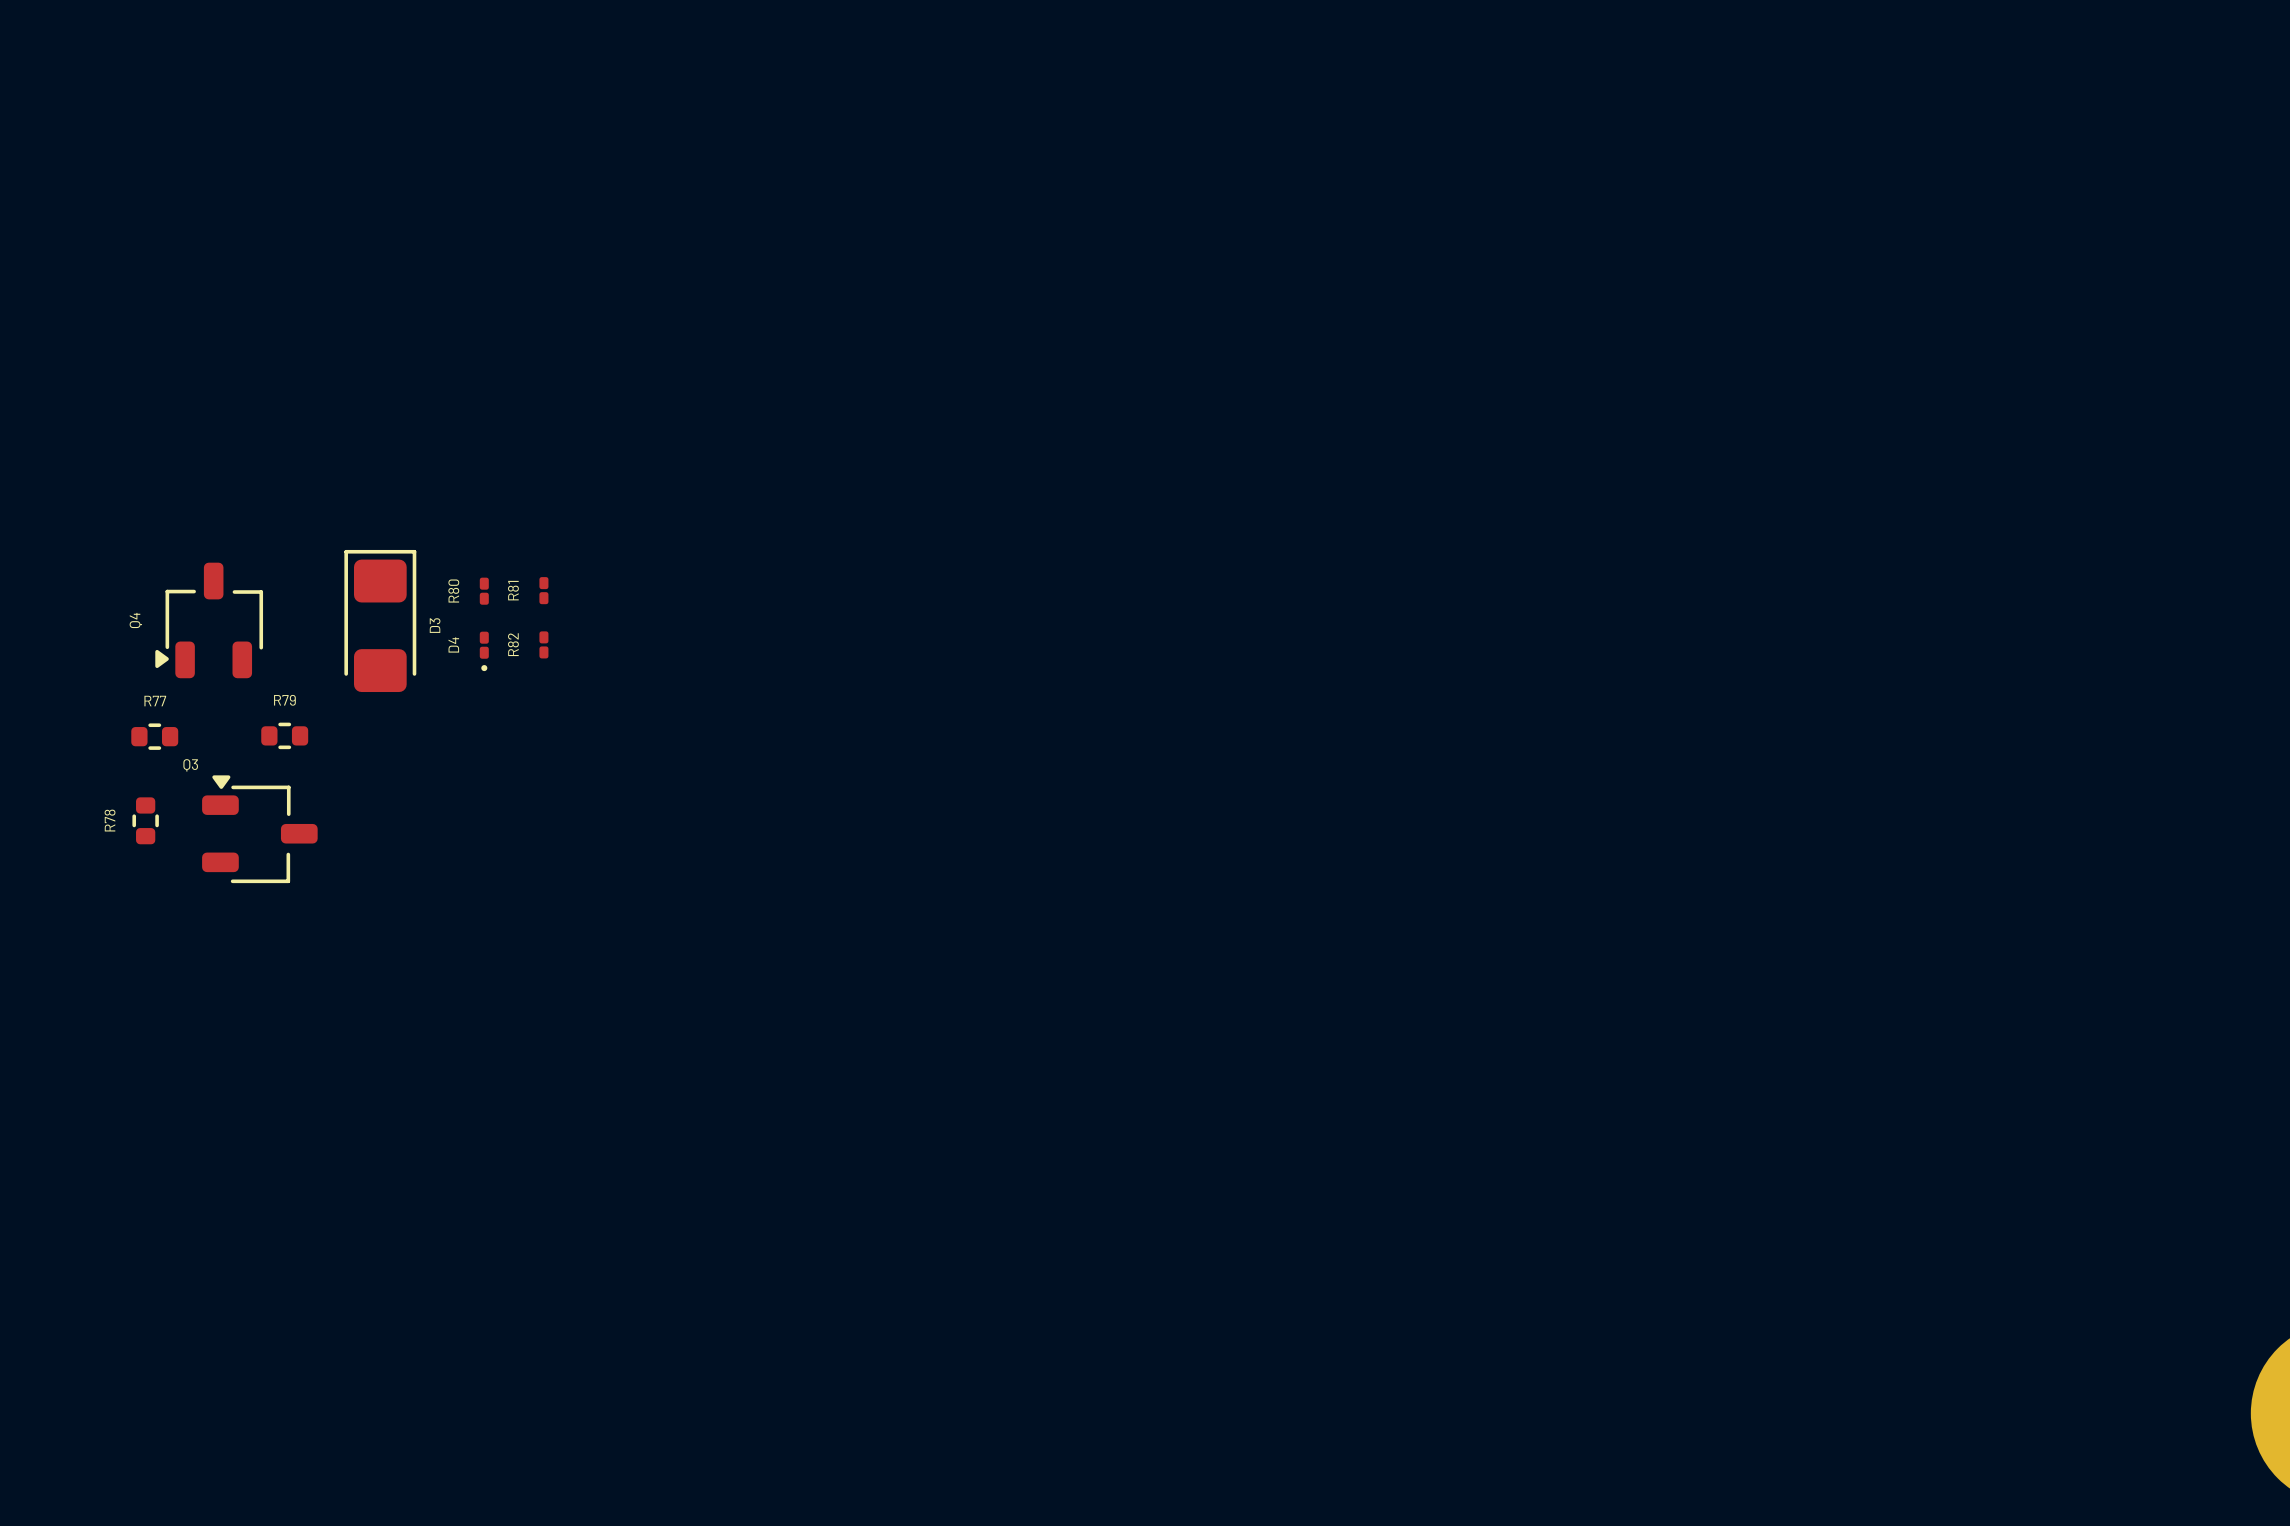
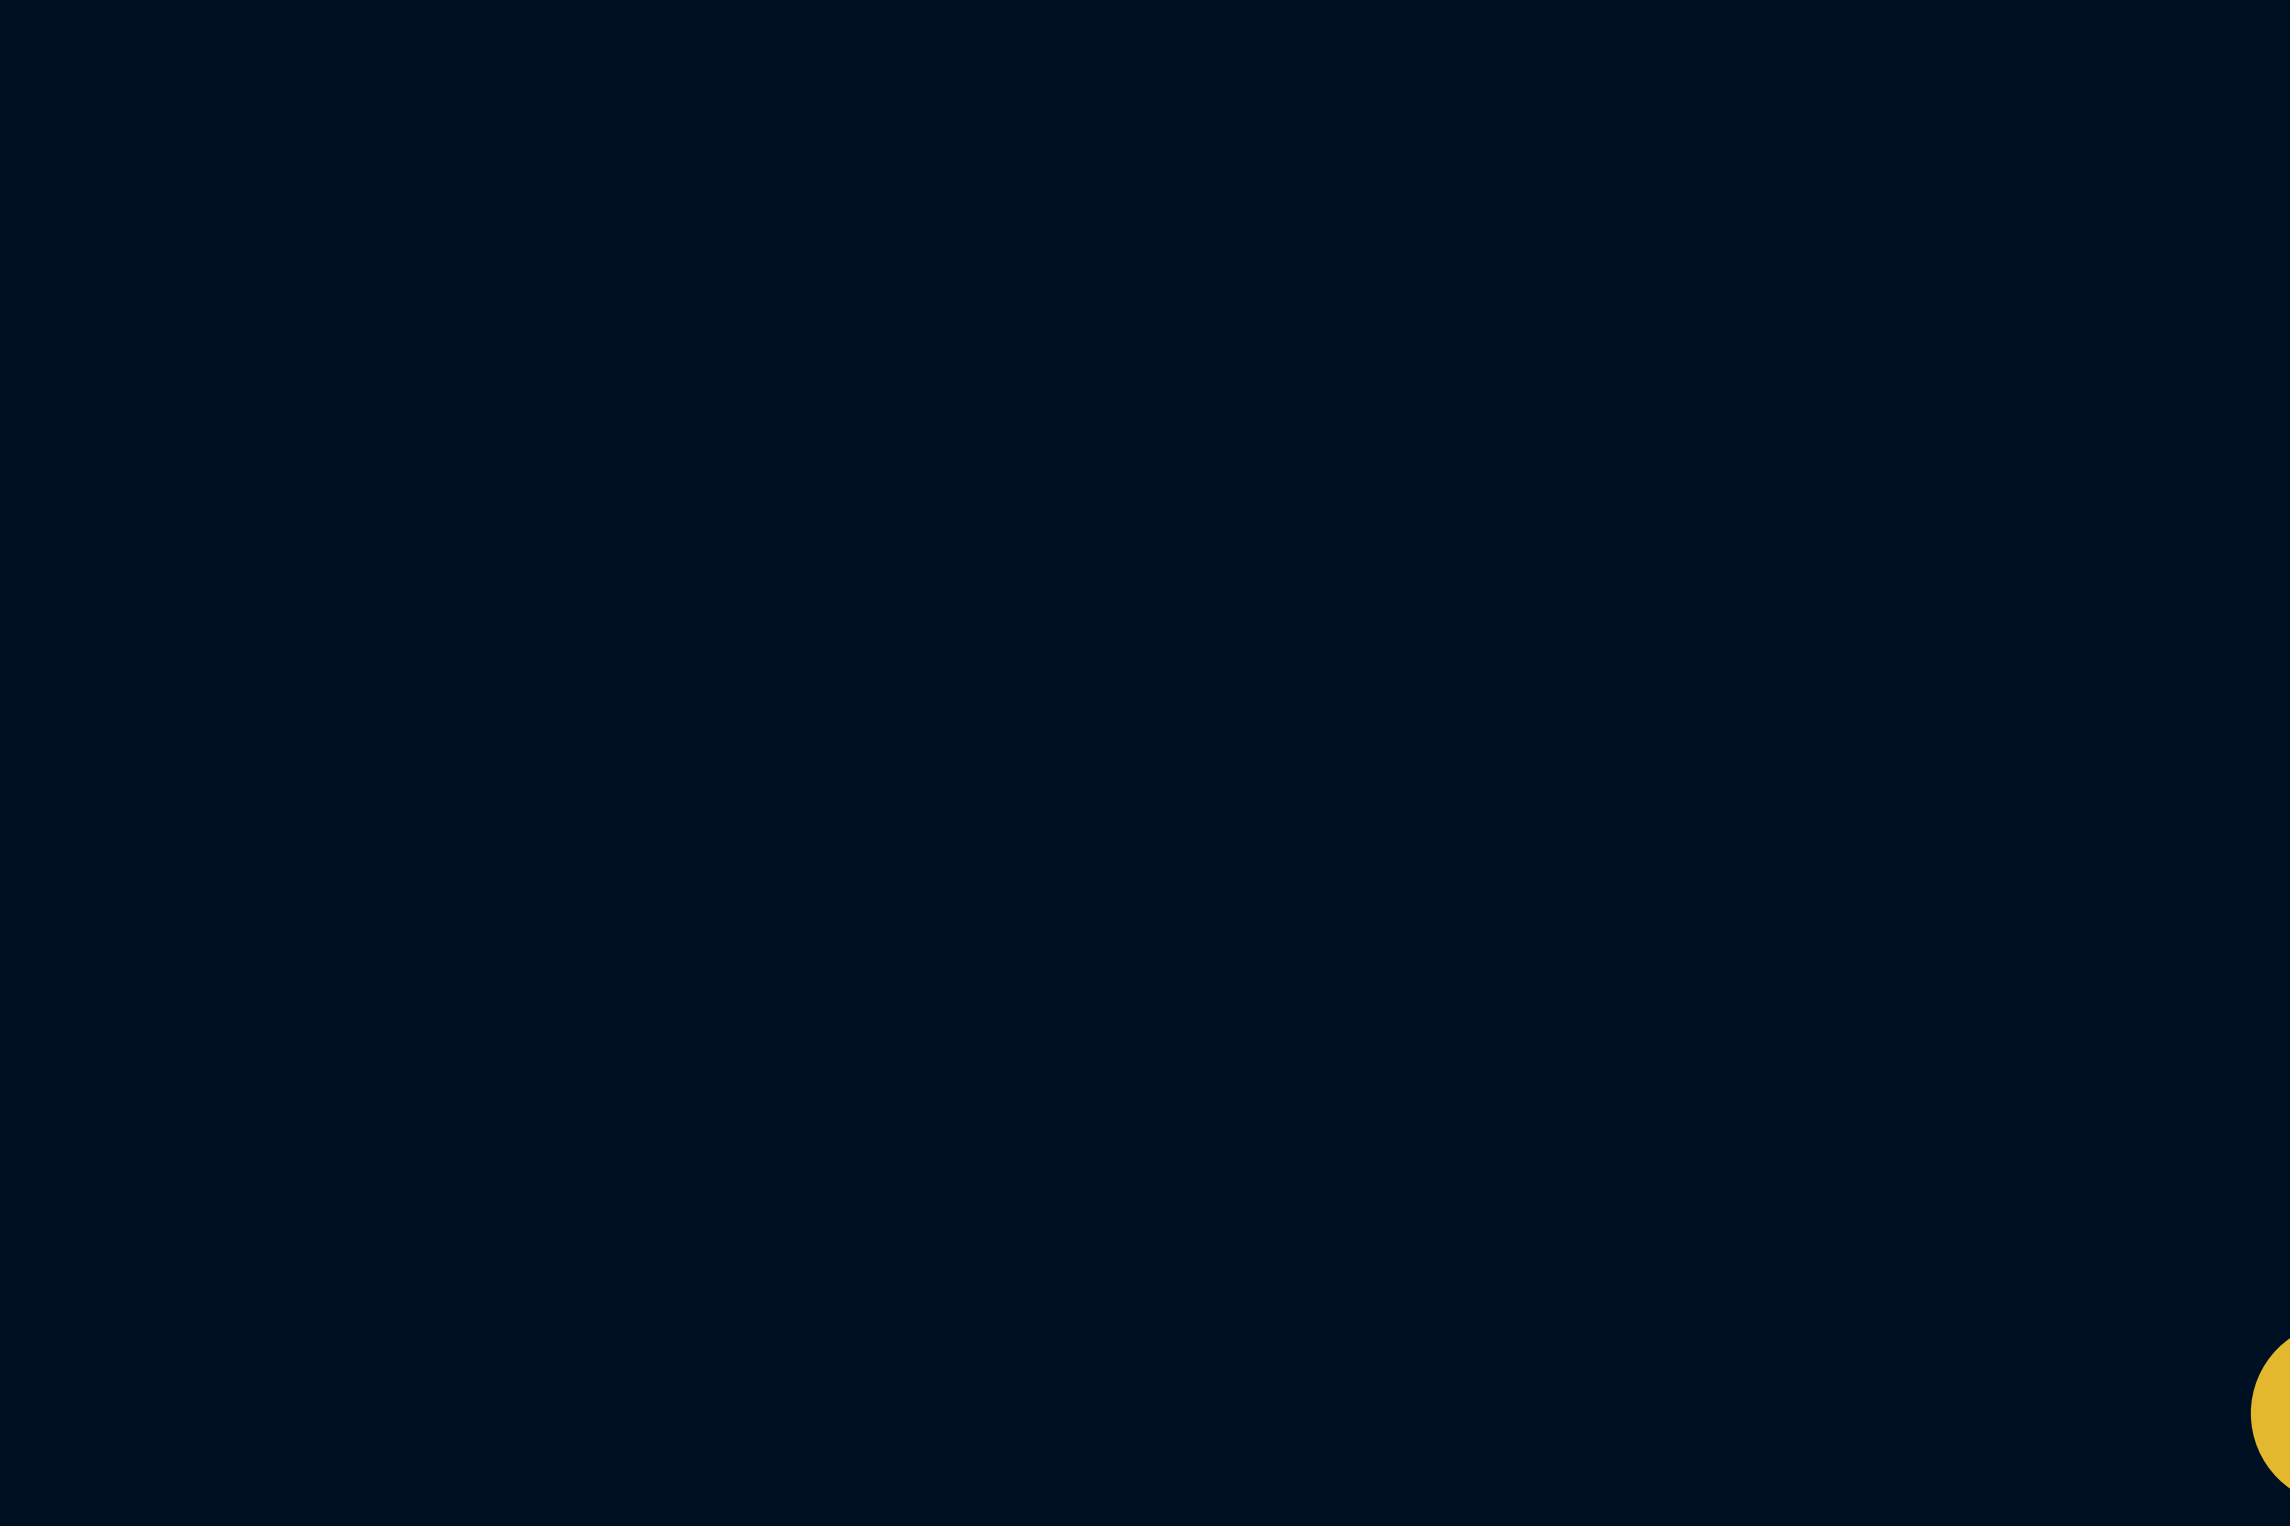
R81: (543, 590) -> none
R80: (484, 591) -> none
Q4: (209, 620) -> none
D3: (380, 620) -> none
R82: (543, 644) -> none
D4: (484, 651) -> none
R79: (284, 735) -> none
R77: (154, 736) -> none
R78: (145, 820) -> none
Q3: (259, 829) -> none

